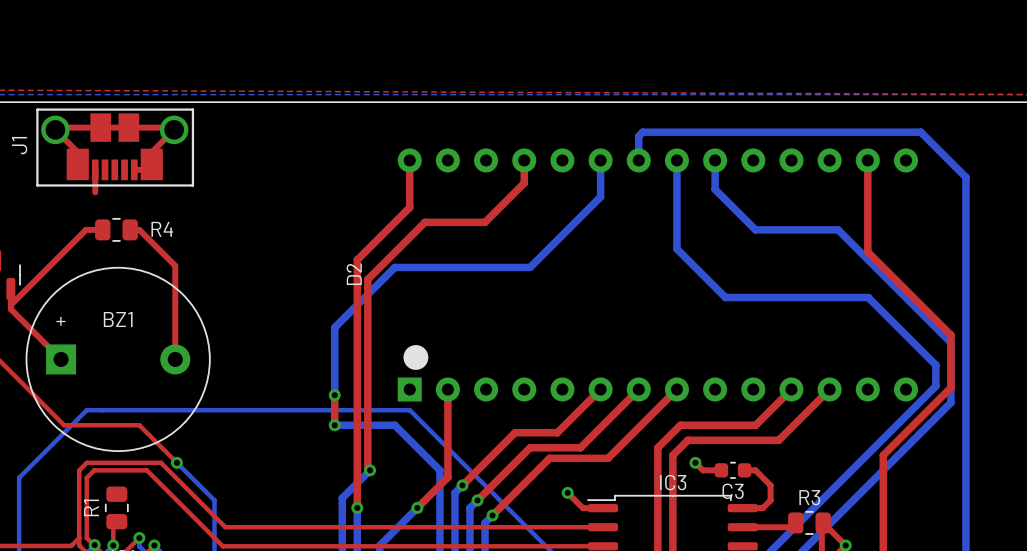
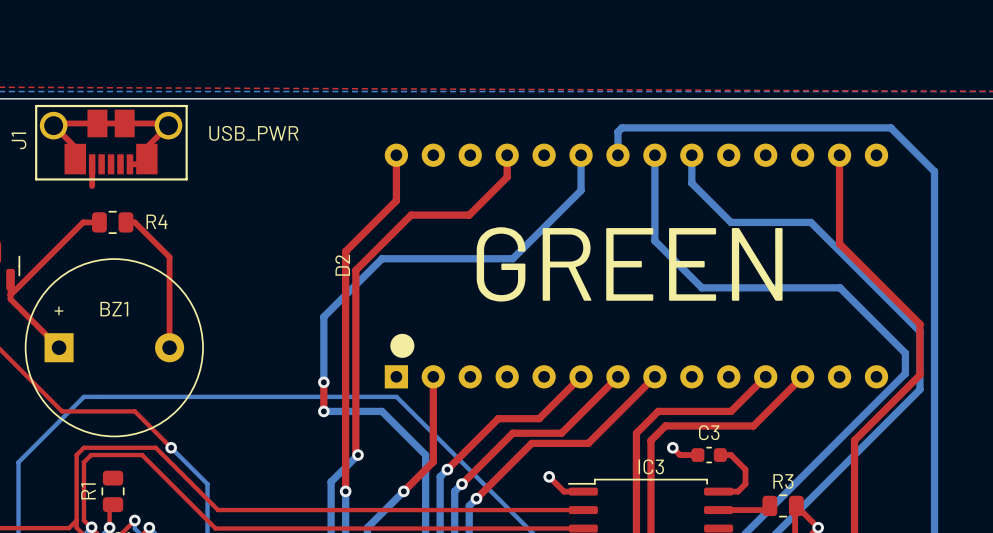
text: none -> USB_PWR (253, 133)
text: none -> GREEN (629, 264)
C3 name position: C3 (733, 491) -> C3 (709, 432)

